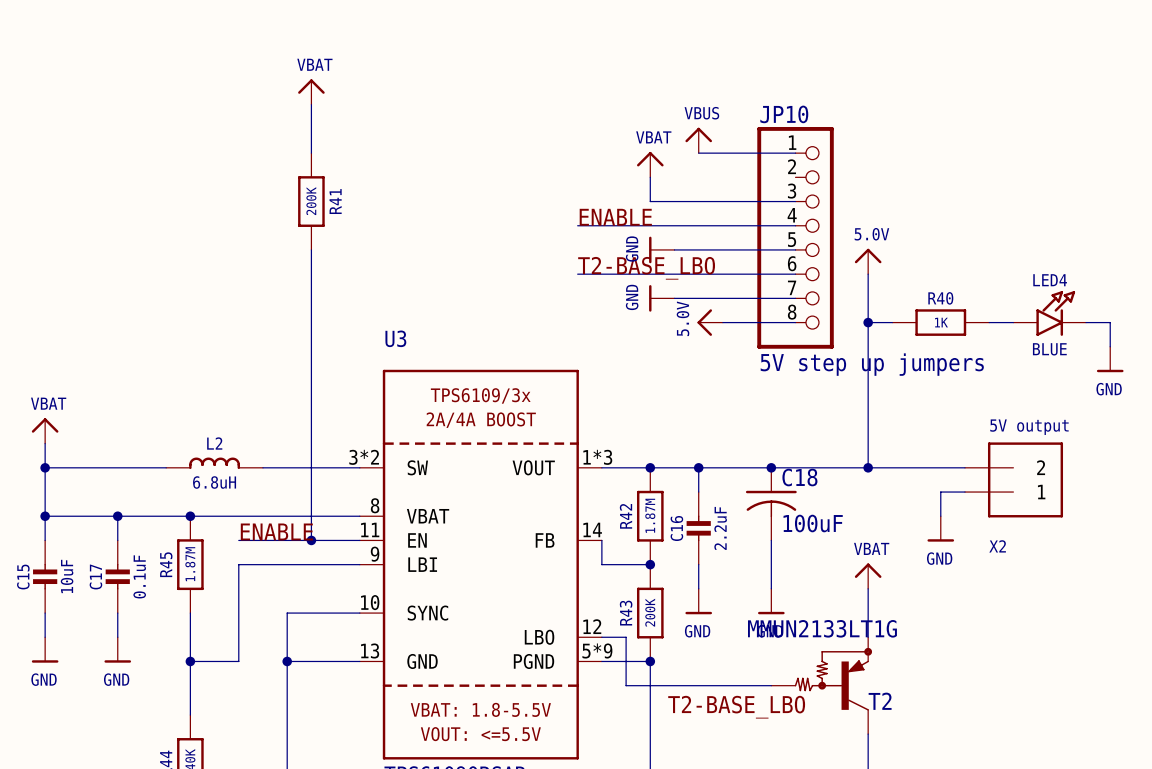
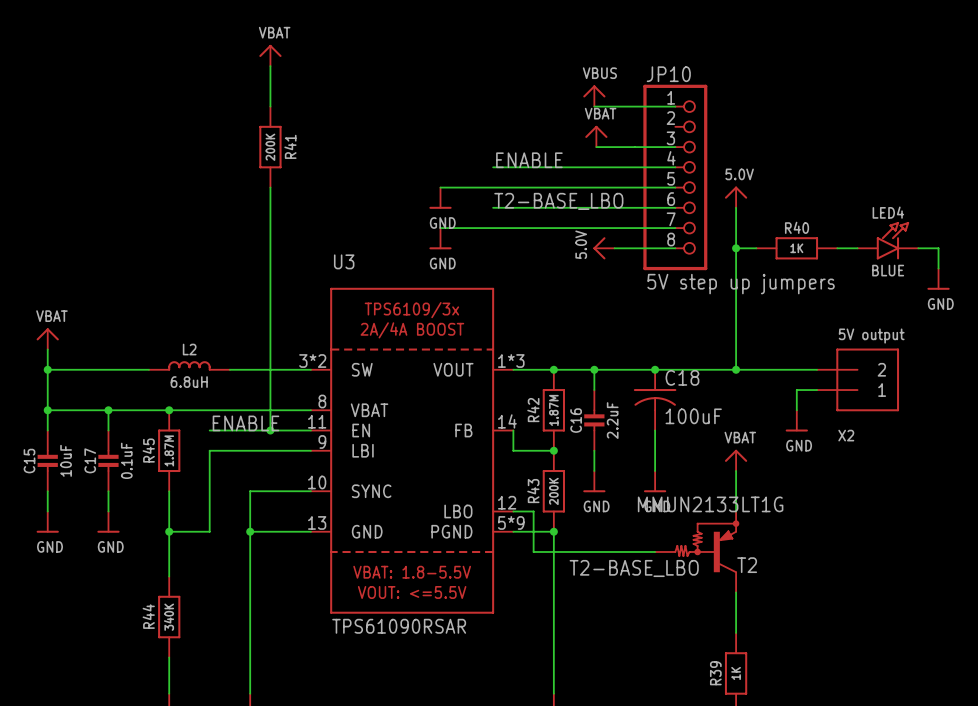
power symbol position: VBAT (650, 164) -> VBAT (596, 136)
wire: (650, 177) (650, 201) (701, 201) -> none
wire: none -> (440, 187) (574, 187)
power symbol: GND (661, 249) -> none
power symbol: none -> GND (440, 198)
wire: none -> (440, 228) (574, 228)
power symbol: GND (661, 298) -> none
power symbol: none -> GND (440, 238)

